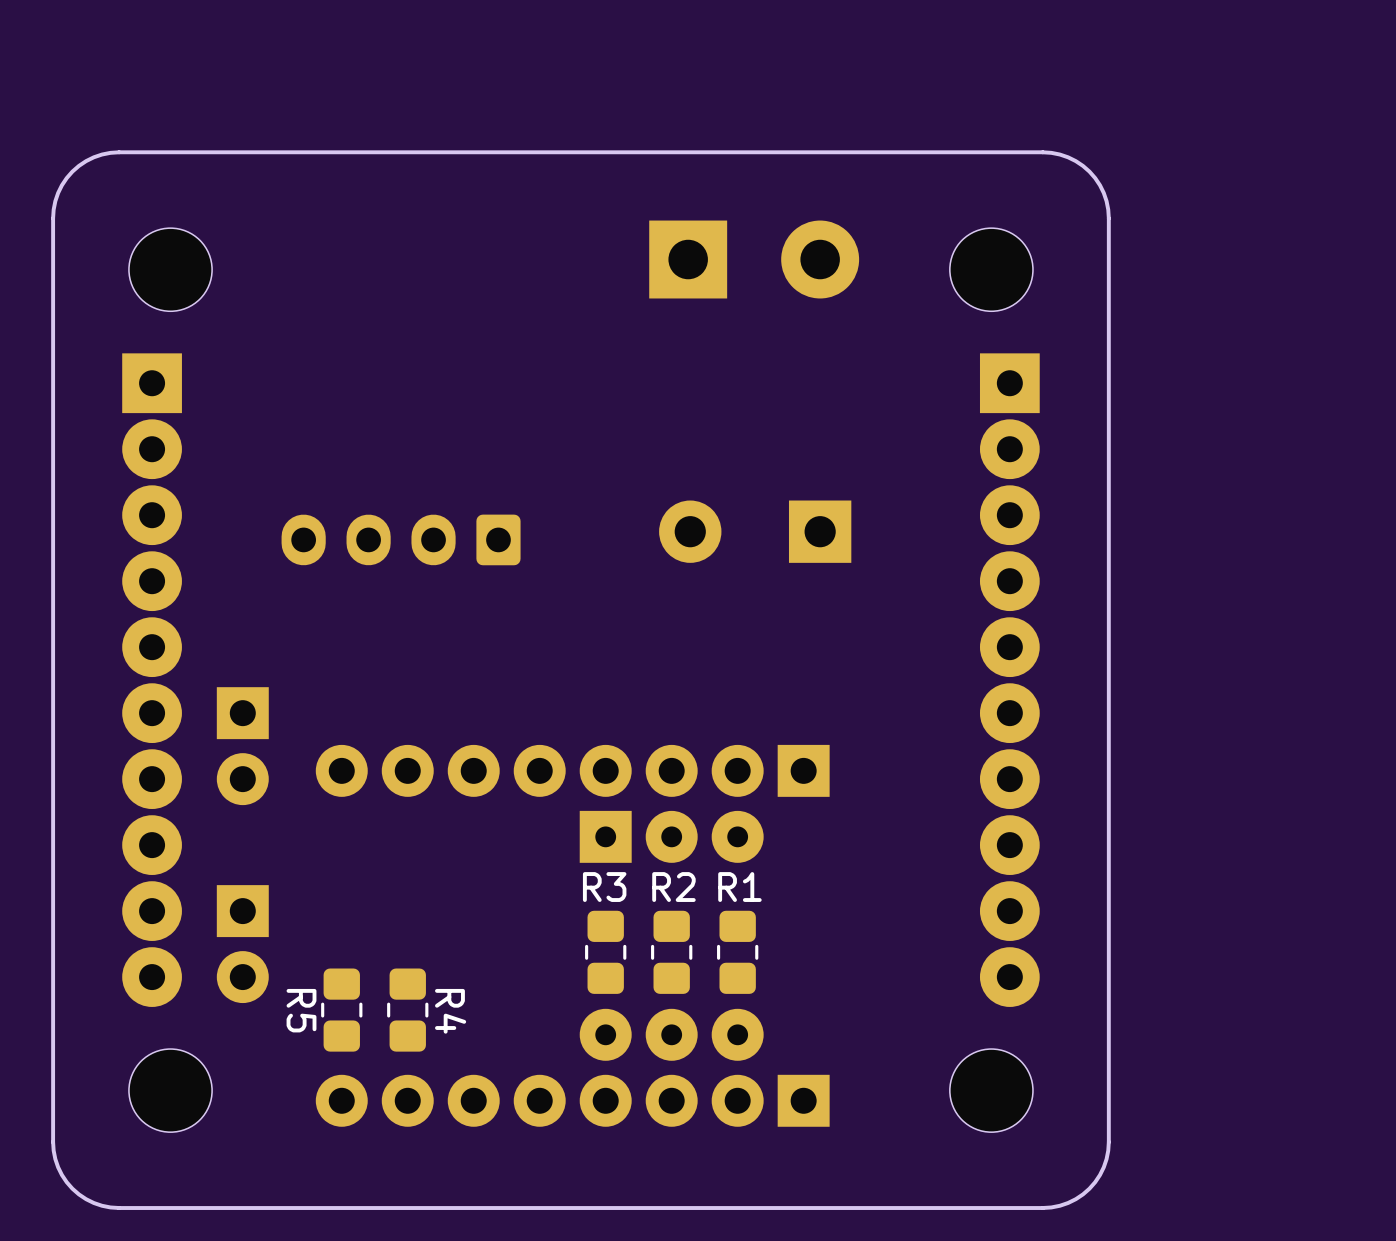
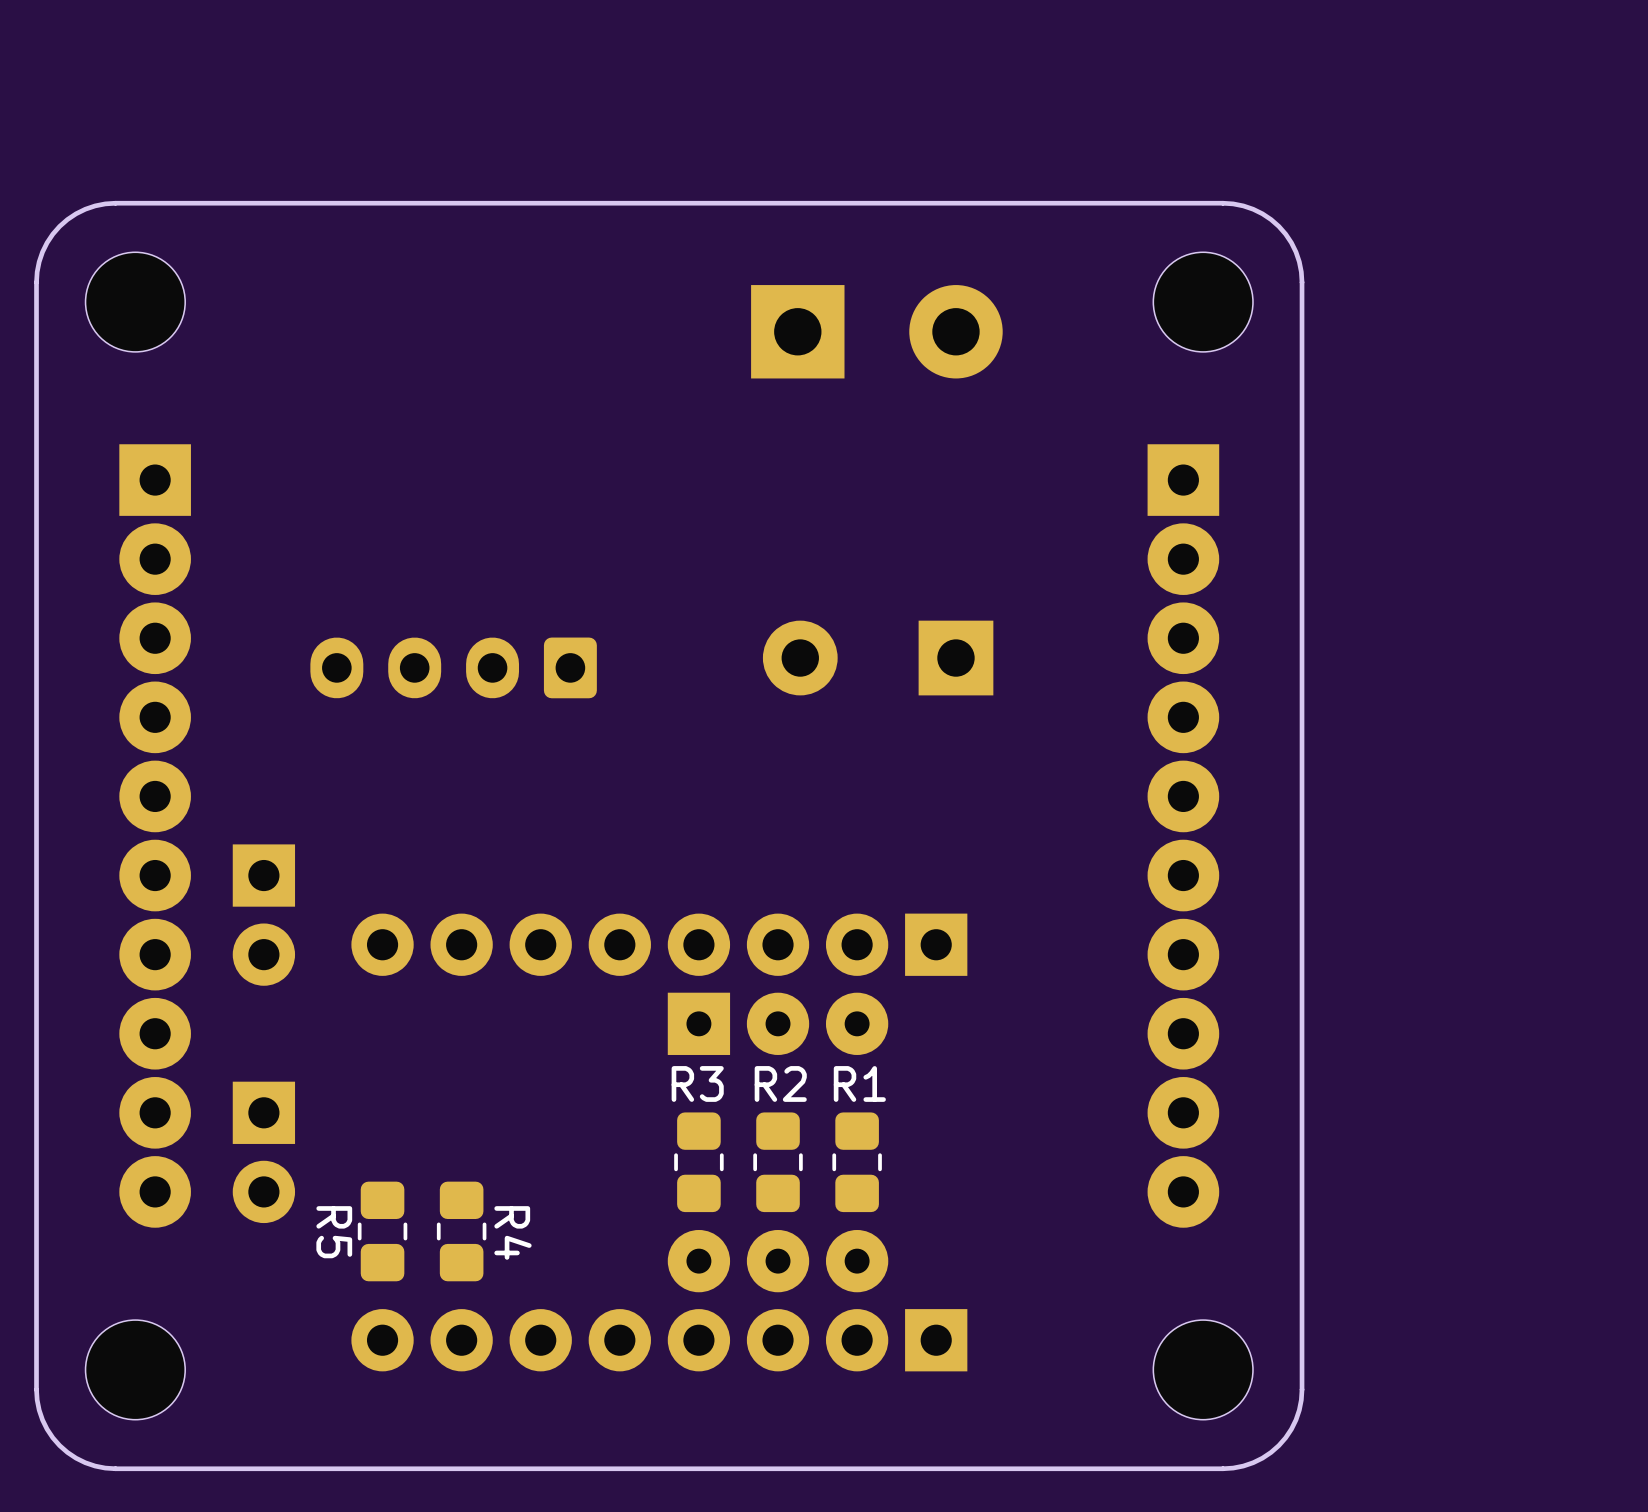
part position: (170, 269) -> (135, 302)
part position: (991, 269) -> (1203, 302)
part position: (170, 1090) -> (135, 1369)
part position: (991, 1090) -> (1203, 1369)

